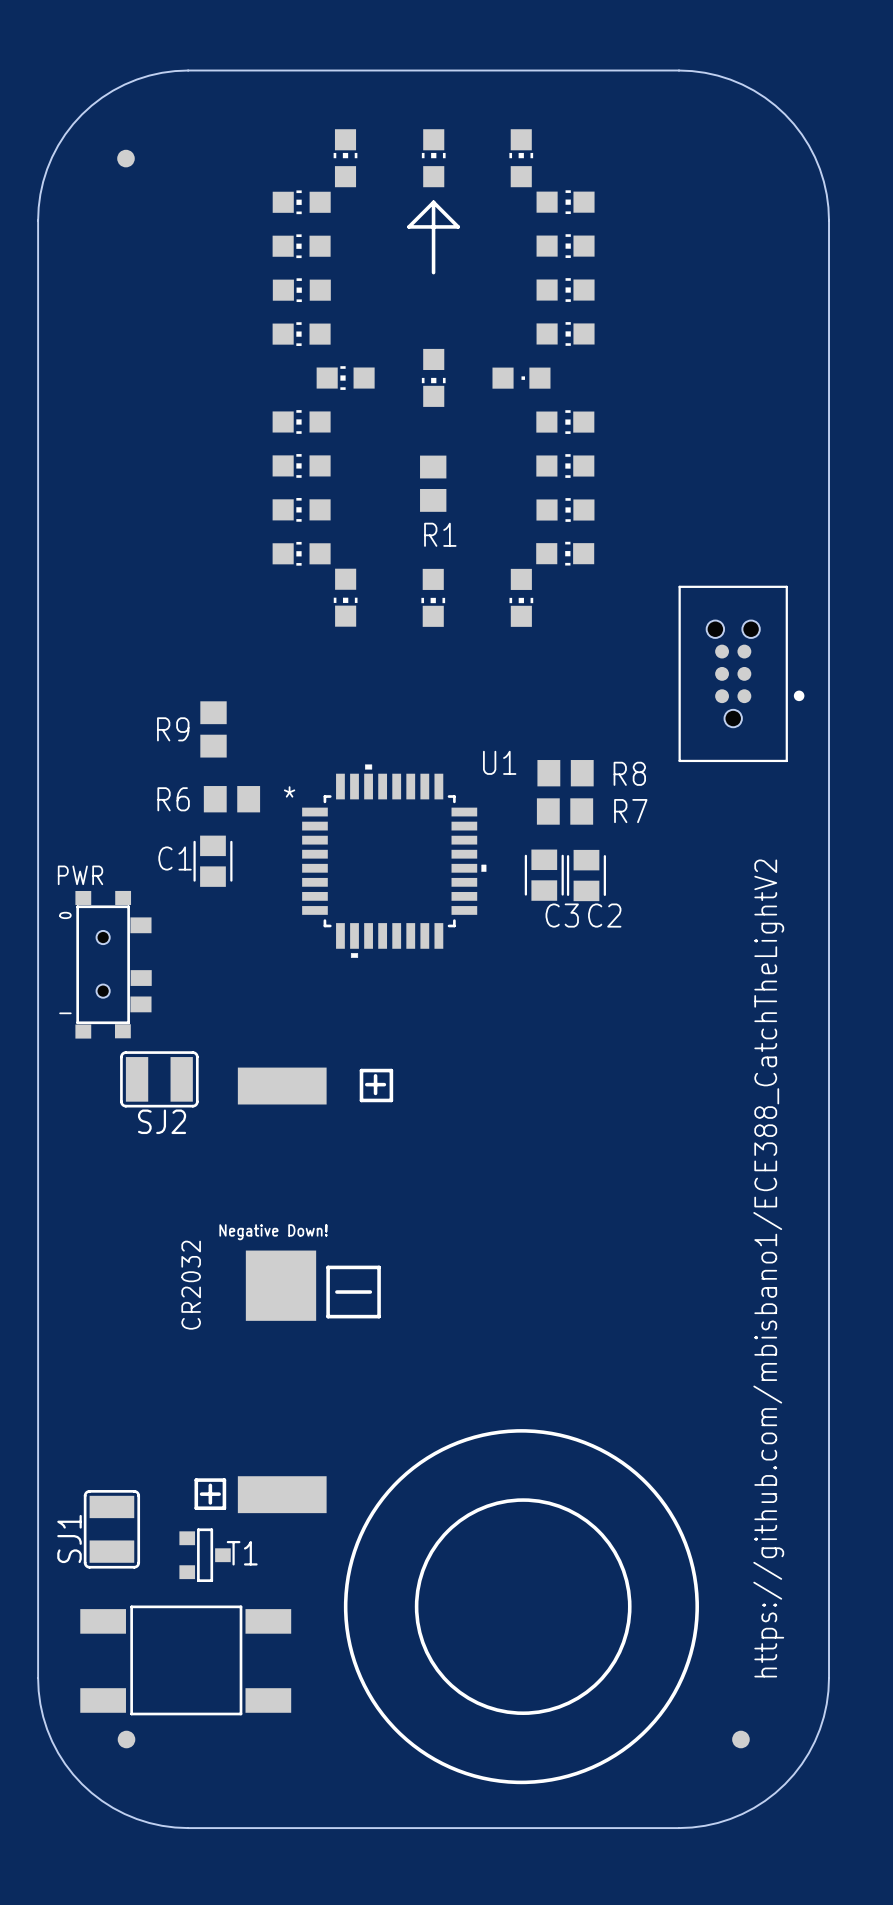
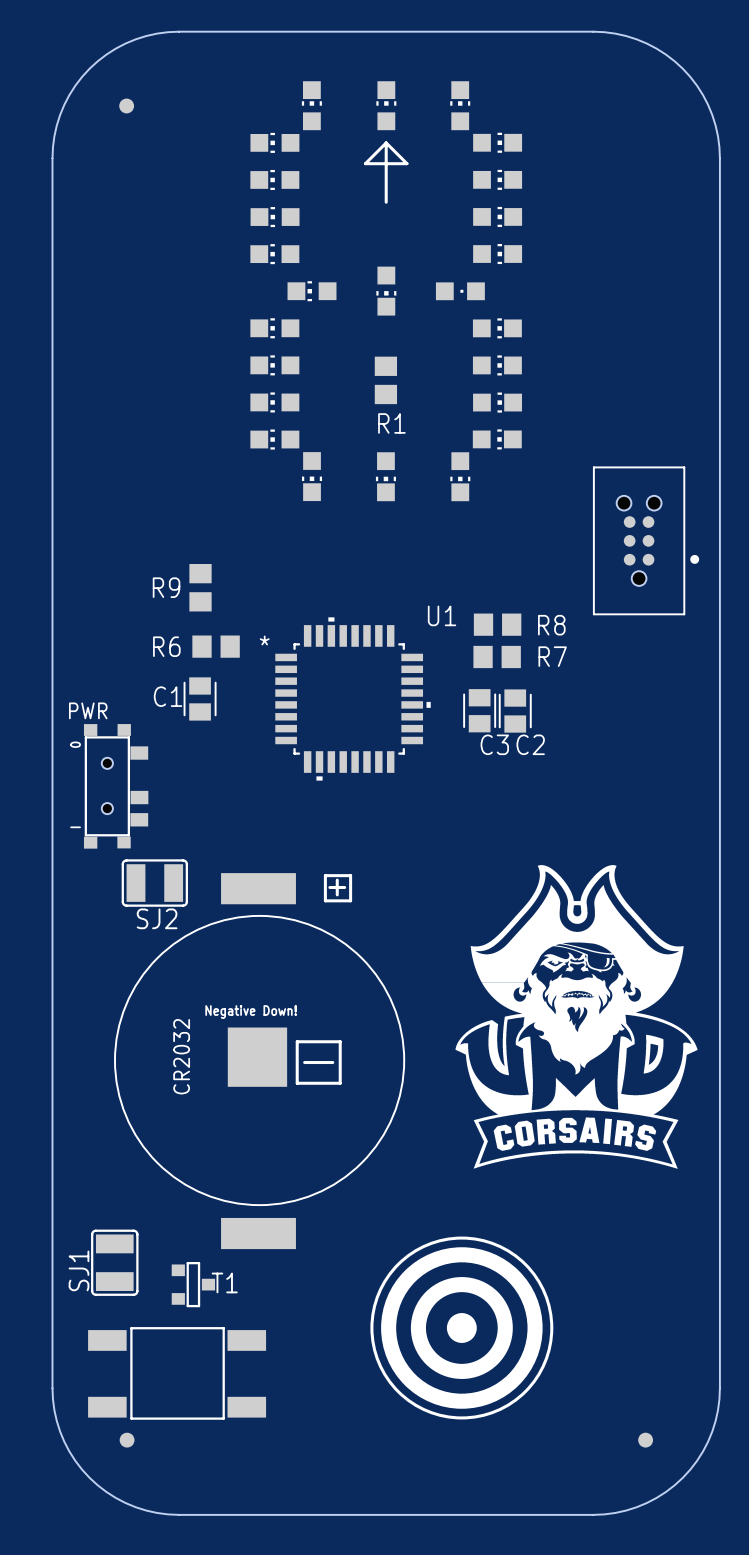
drawing: none -> [455, 865, 698, 1169]
drawing: none -> [114, 915, 405, 1206]
text: https://github.com/mbisbano1/ECE388_CatchTheLightV2 (768, 1268) -> none
drawing: [343, 1429, 699, 1785] -> none
line: (196, 1480) (196, 1508) (224, 1508) (224, 1480) (196, 1480) -> none
line: (210, 1485) (210, 1502) -> none
line: (201, 1494) (219, 1494) -> none
drawing: none -> [381, 1247, 543, 1409]

